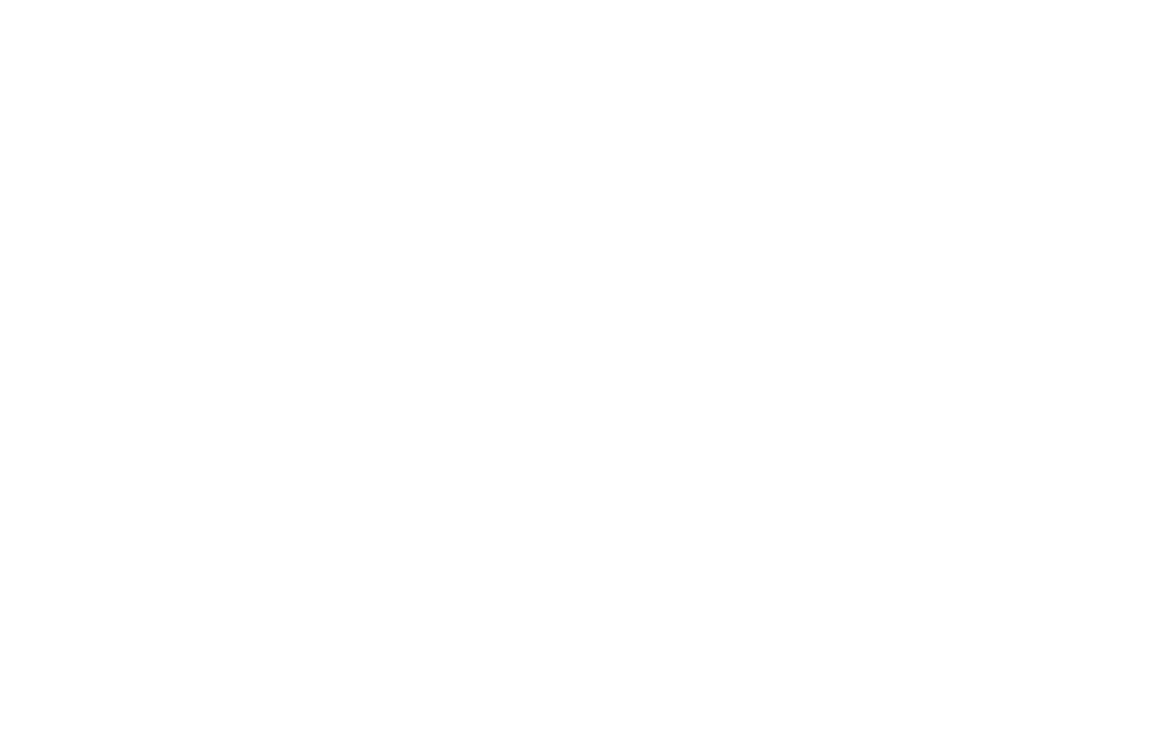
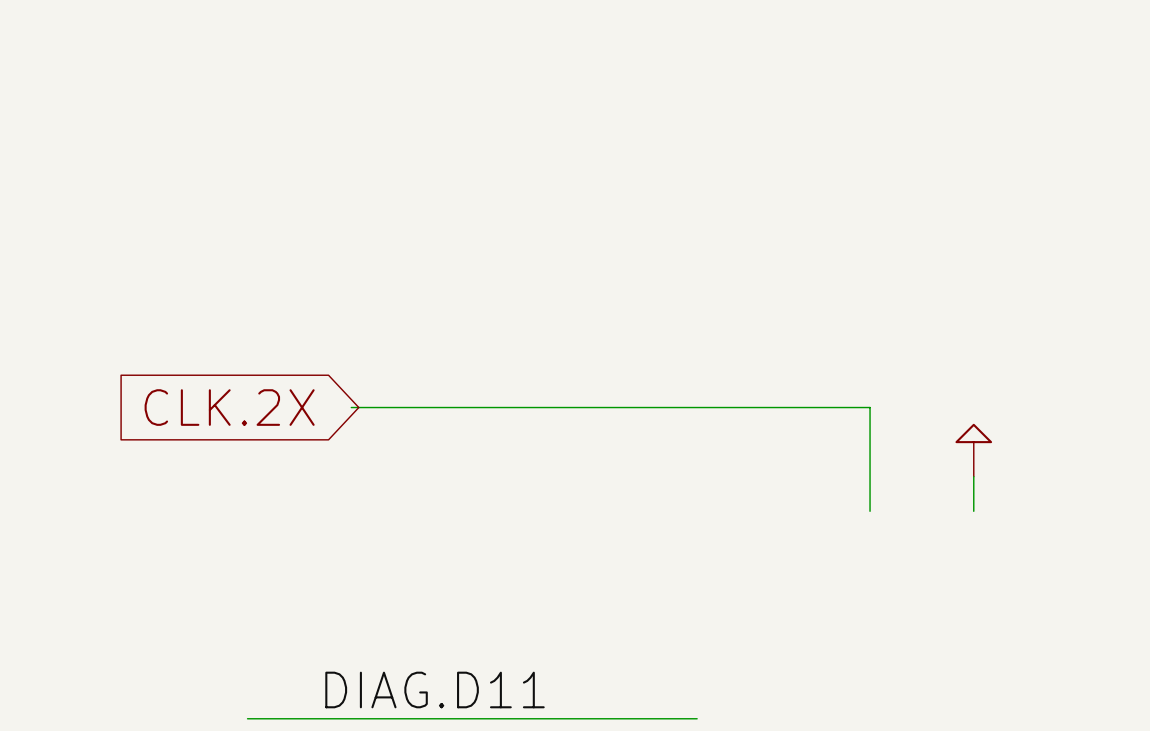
global label: none -> CLK.2X (229, 407)
wire: none -> (351, 407) (870, 407) (870, 511)
power symbol: none -> (973, 450)
wire: none -> (973, 476) (973, 511)
label: none -> DIAG.D11 (435, 689)
wire: none -> (247, 718) (697, 718)

